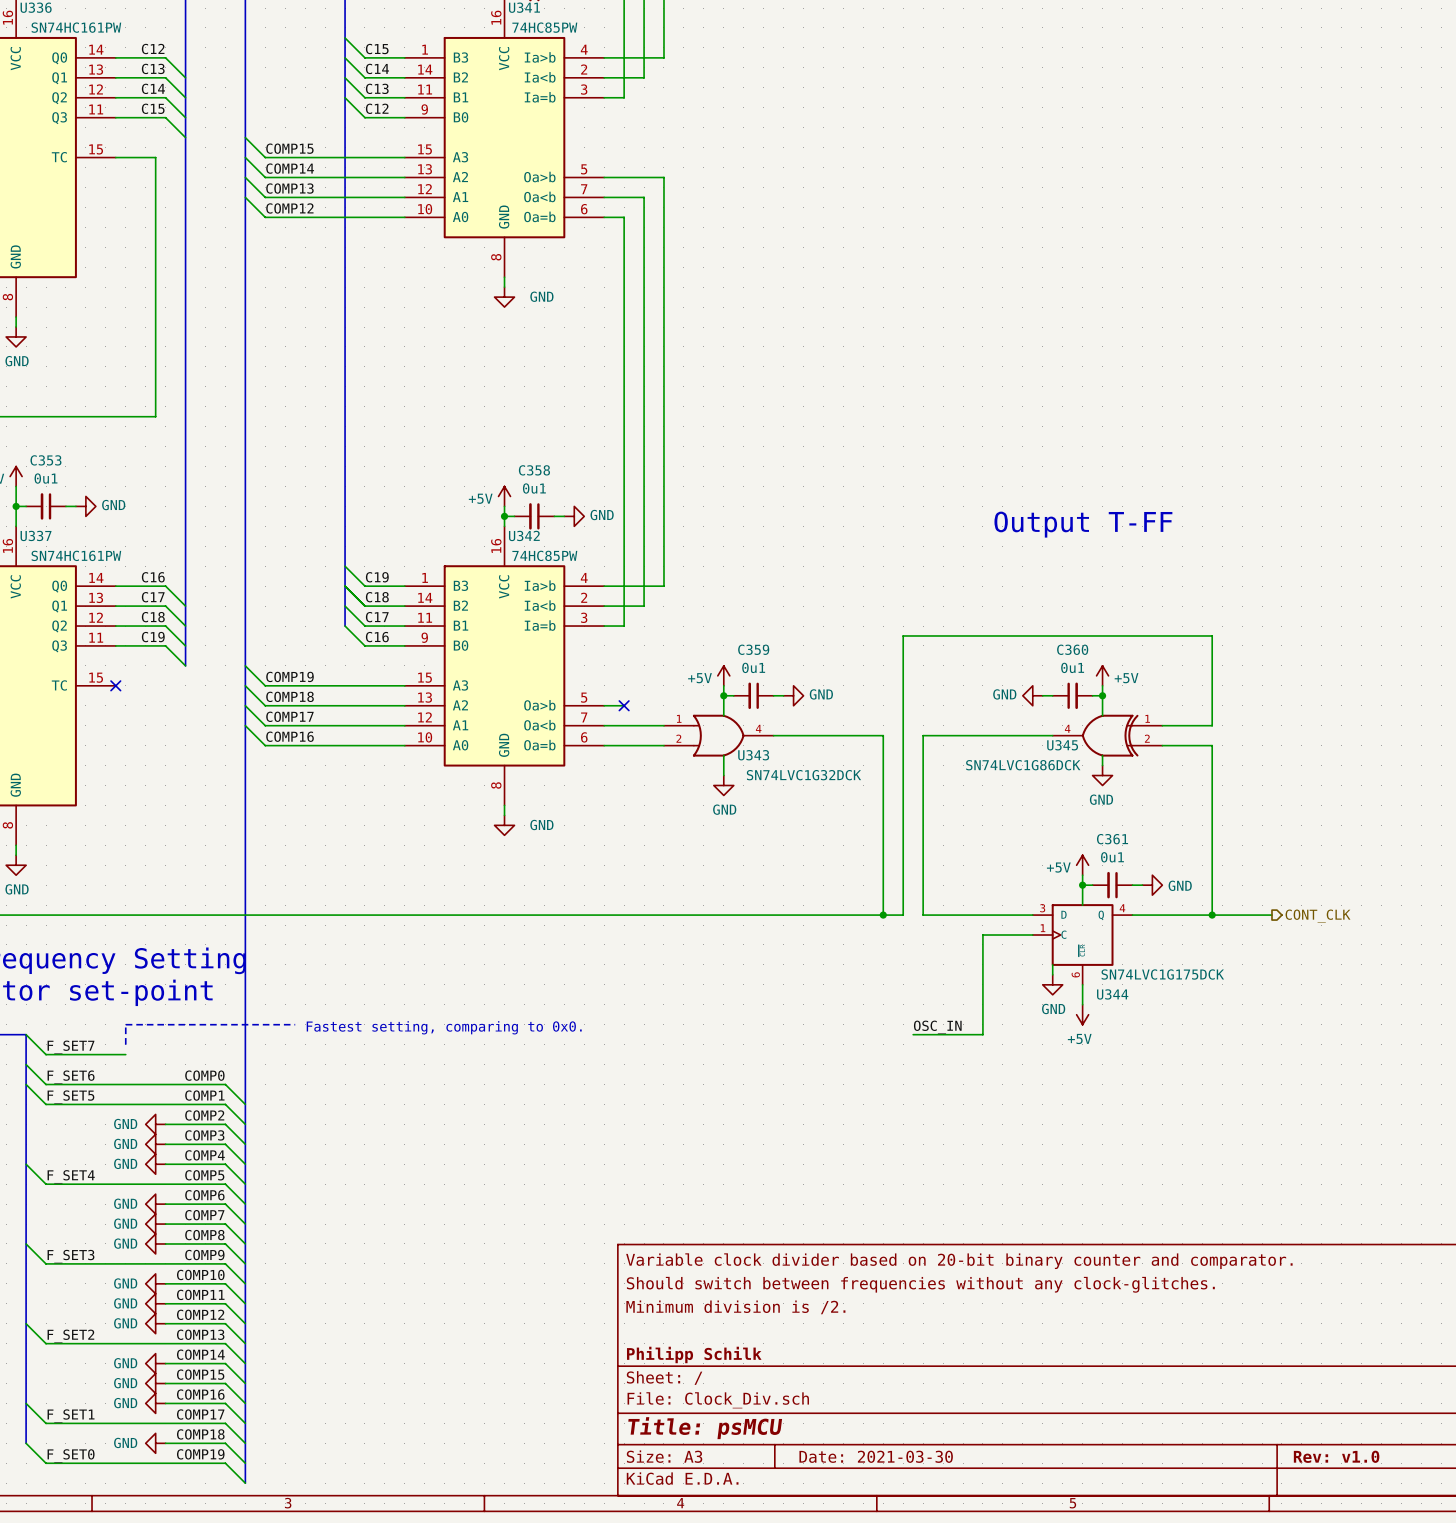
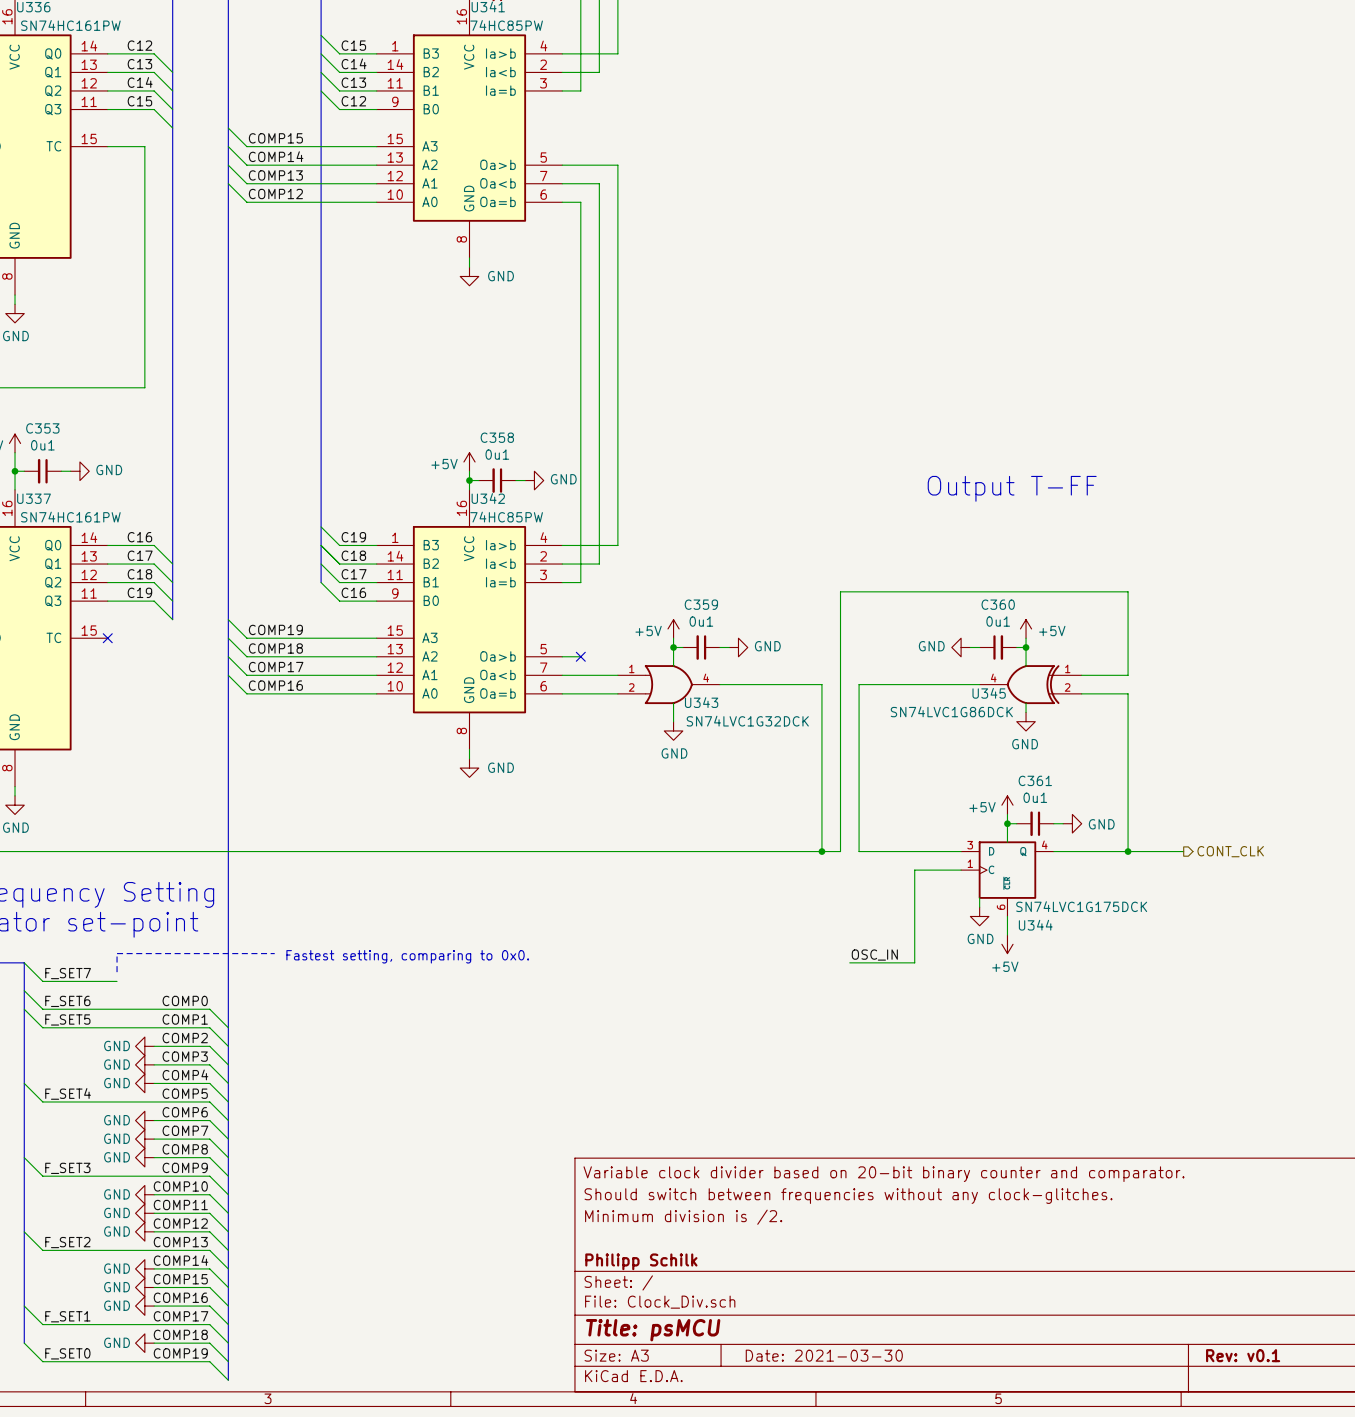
title block: Rev: v1.0 (1336, 1456) -> Rev: v0.1 (1243, 1355)

